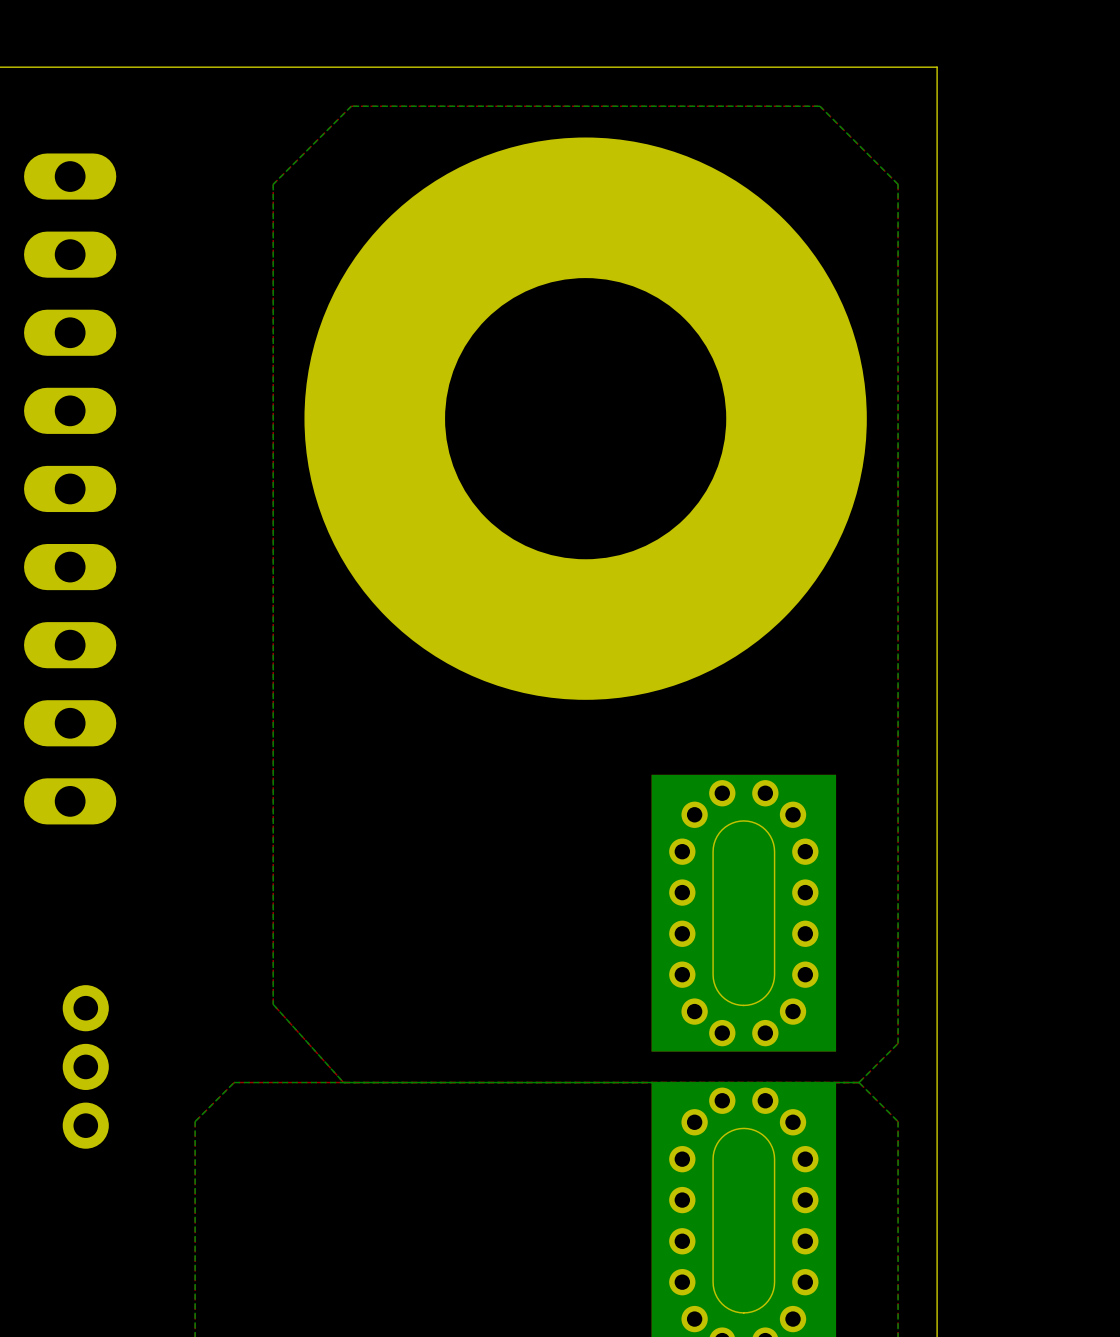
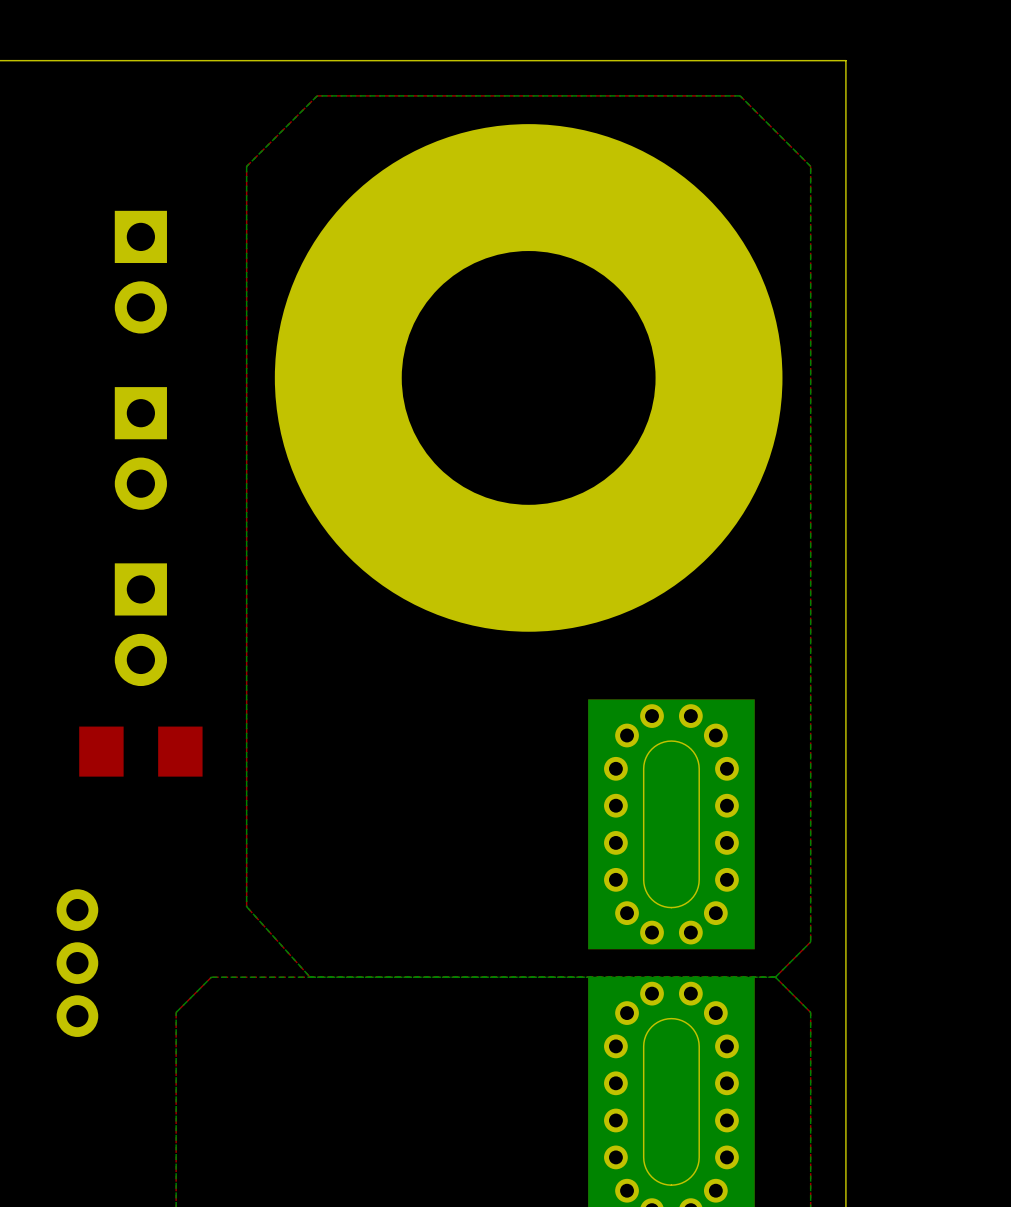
part: none -> (140, 272)
part: (70, 488) -> none
part: none -> (140, 448)
part: none -> (140, 624)
part: none -> (140, 751)

